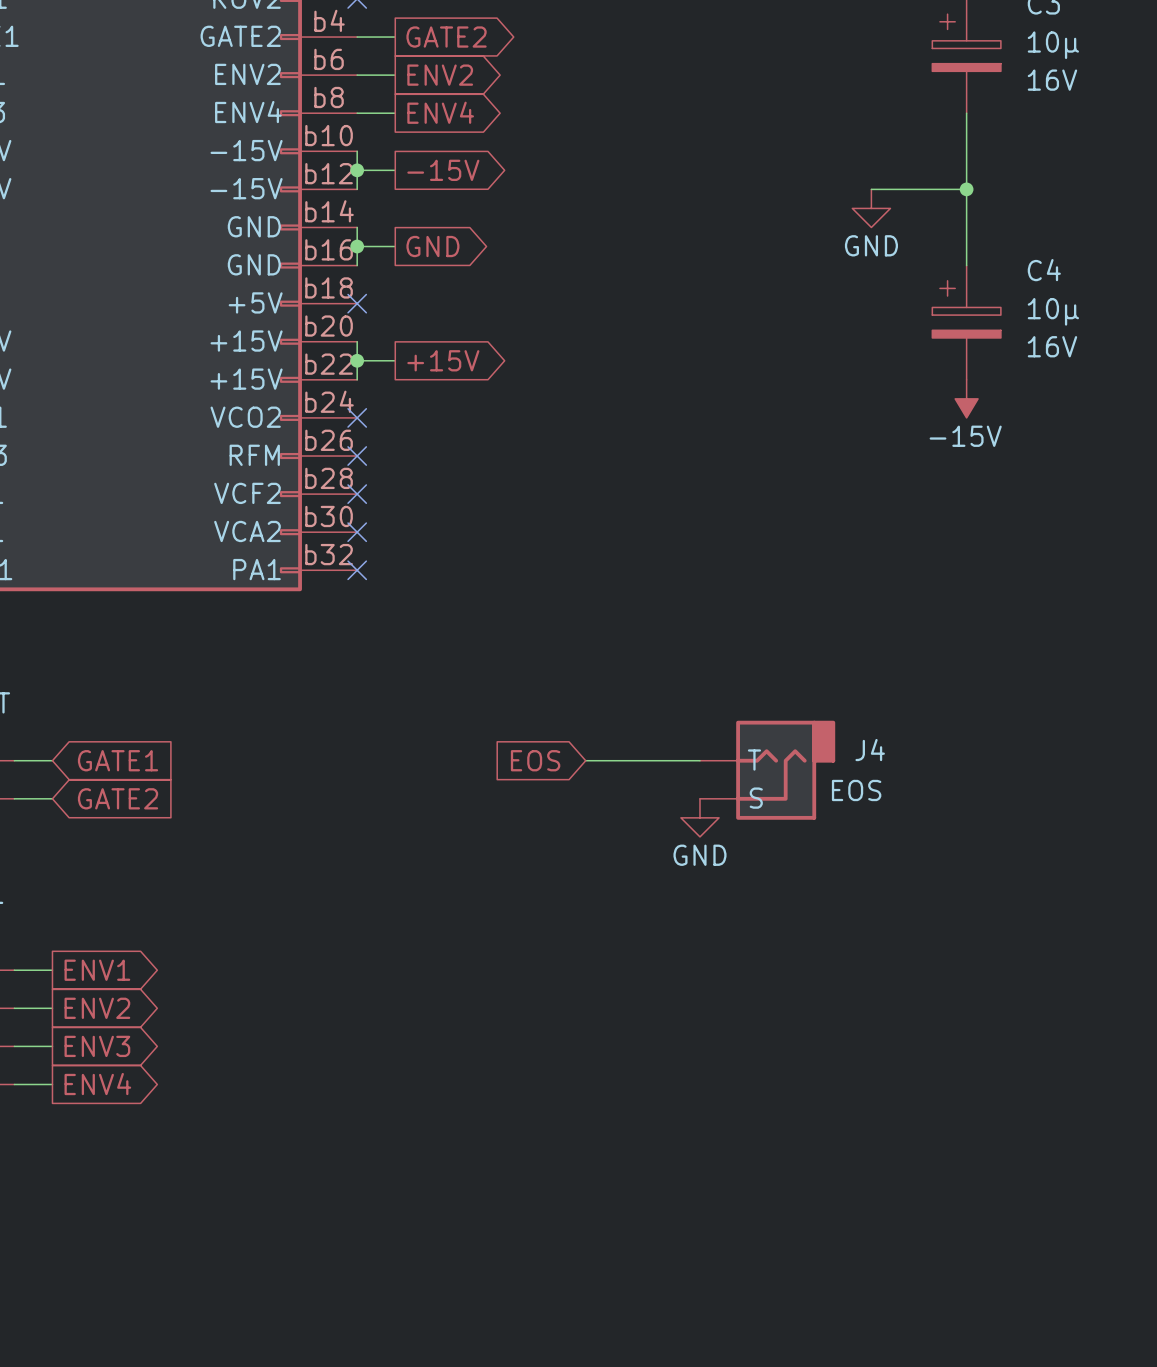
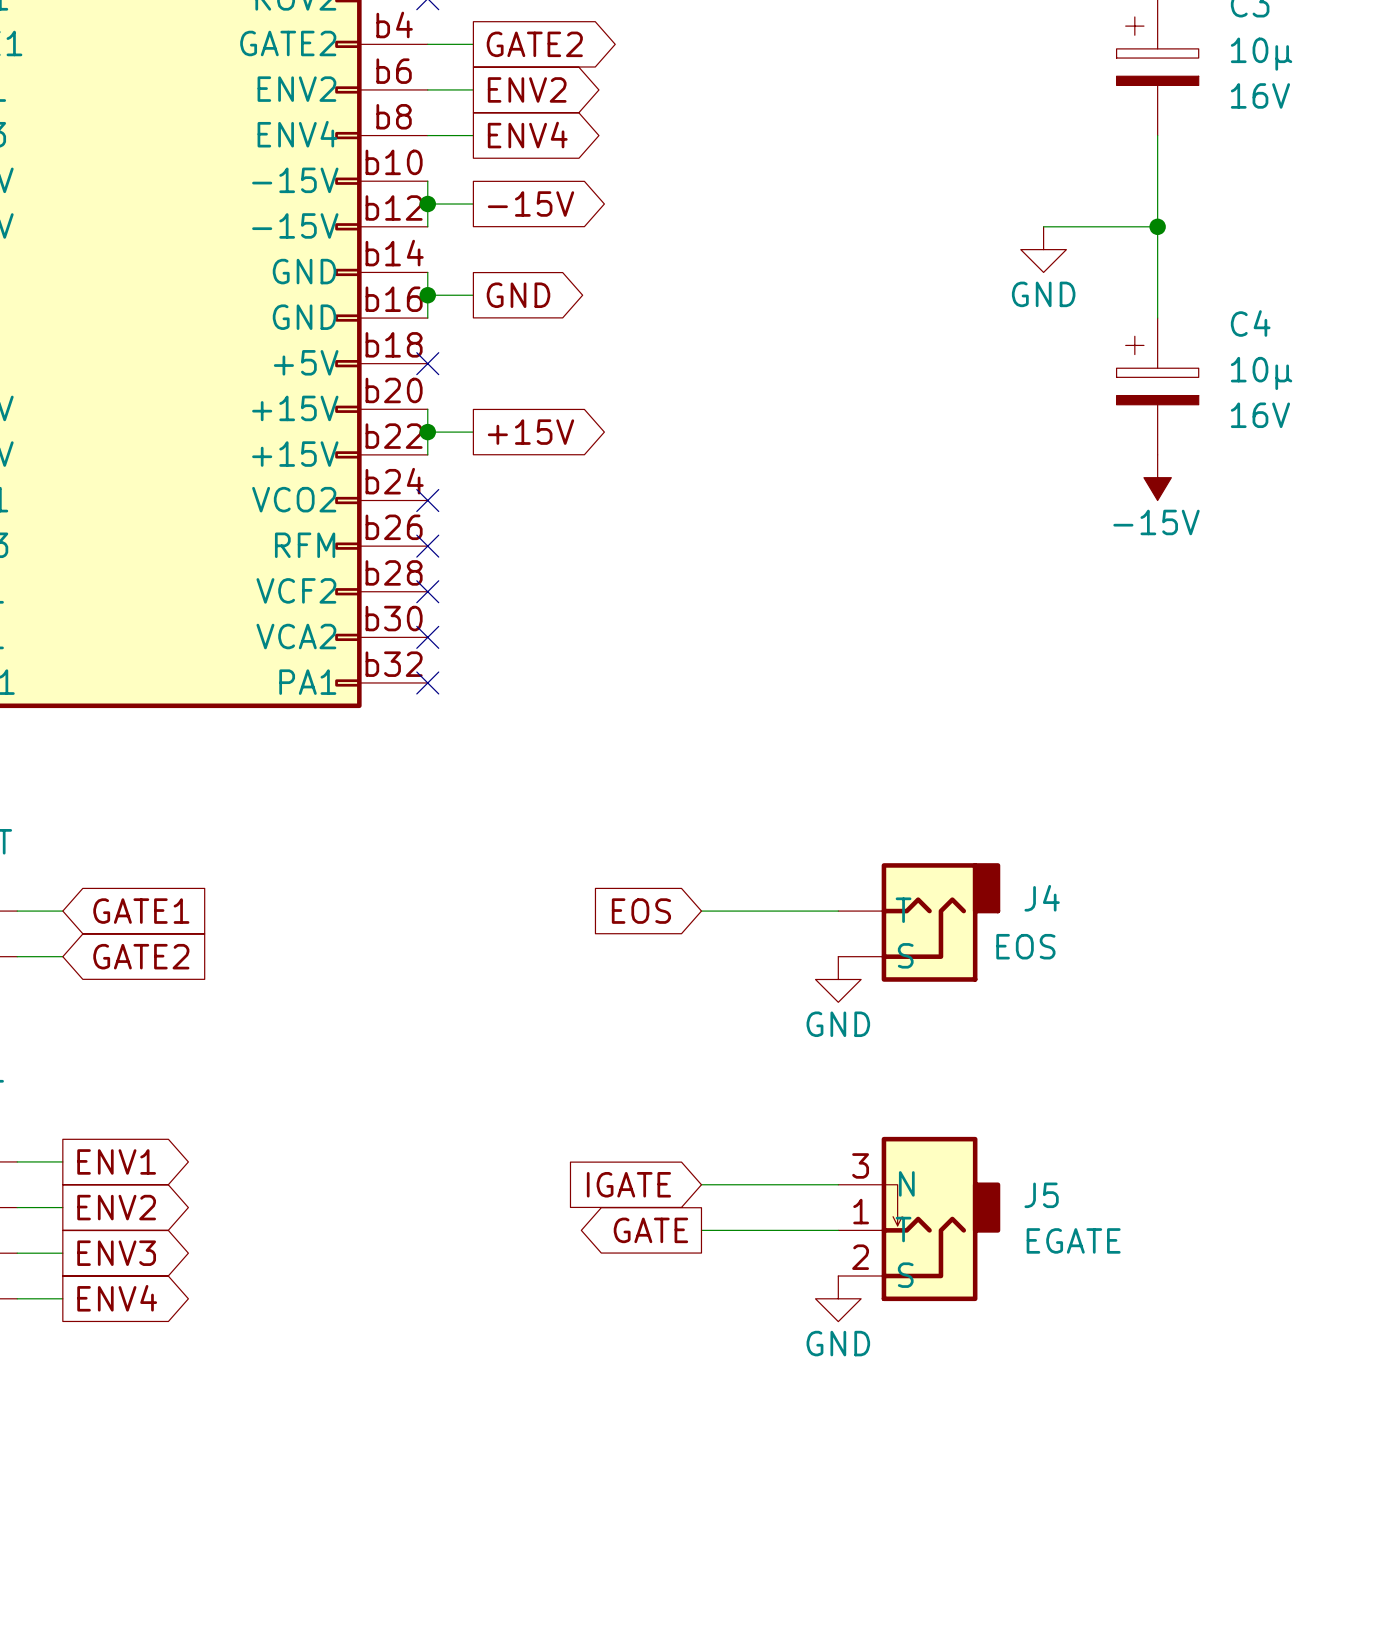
global label: none -> IGATE (628, 1184)
wire: none -> (701, 1184) (838, 1184)
J5: none -> EGATE (919, 1218)
global label: none -> GATE (650, 1230)
wire: none -> (701, 1230) (838, 1230)
power symbol: none -> GND (838, 1298)

